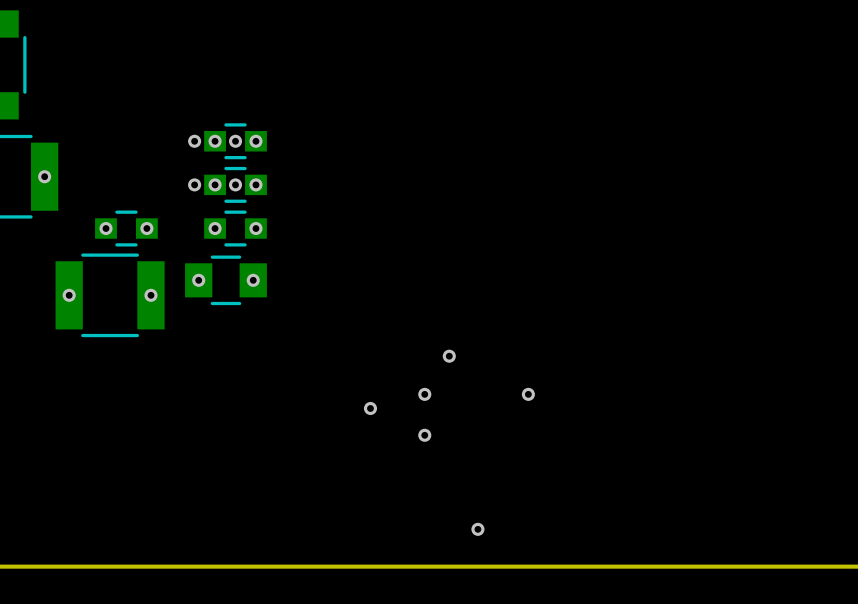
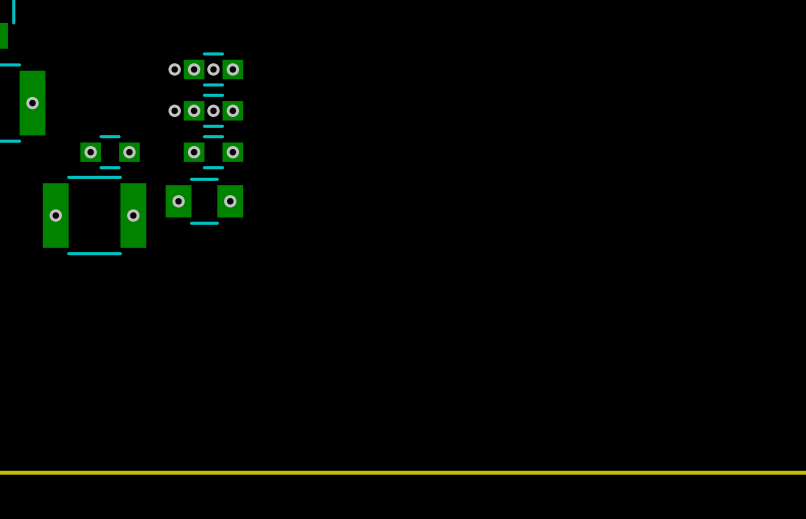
via: (449, 356) -> none
via: (424, 394) -> none
via: (528, 394) -> none
via: (370, 408) -> none
via: (424, 435) -> none
via: (477, 529) -> none

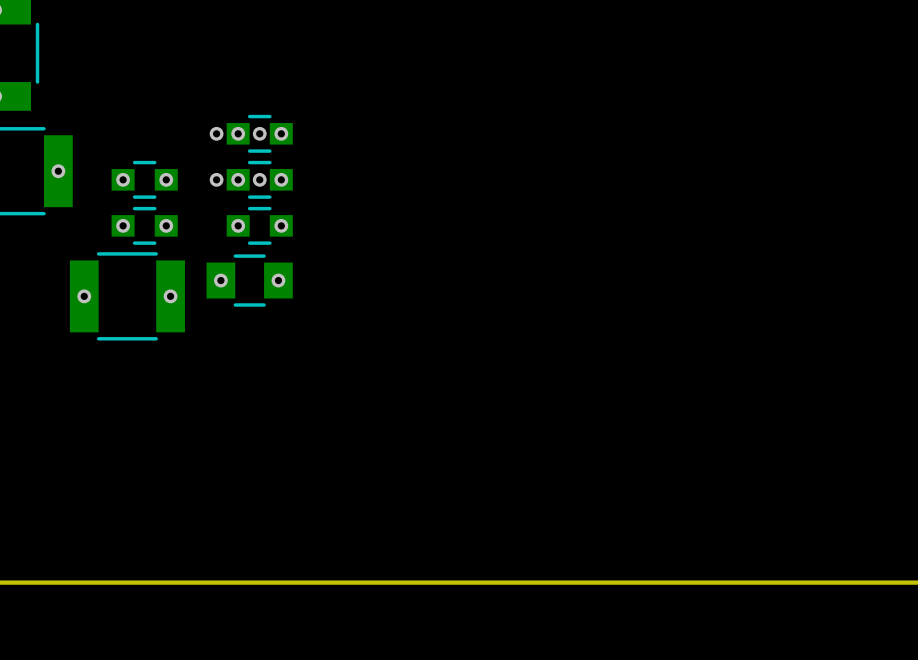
via: none -> (123, 179)
part: none -> (144, 179)
via: none -> (166, 179)

